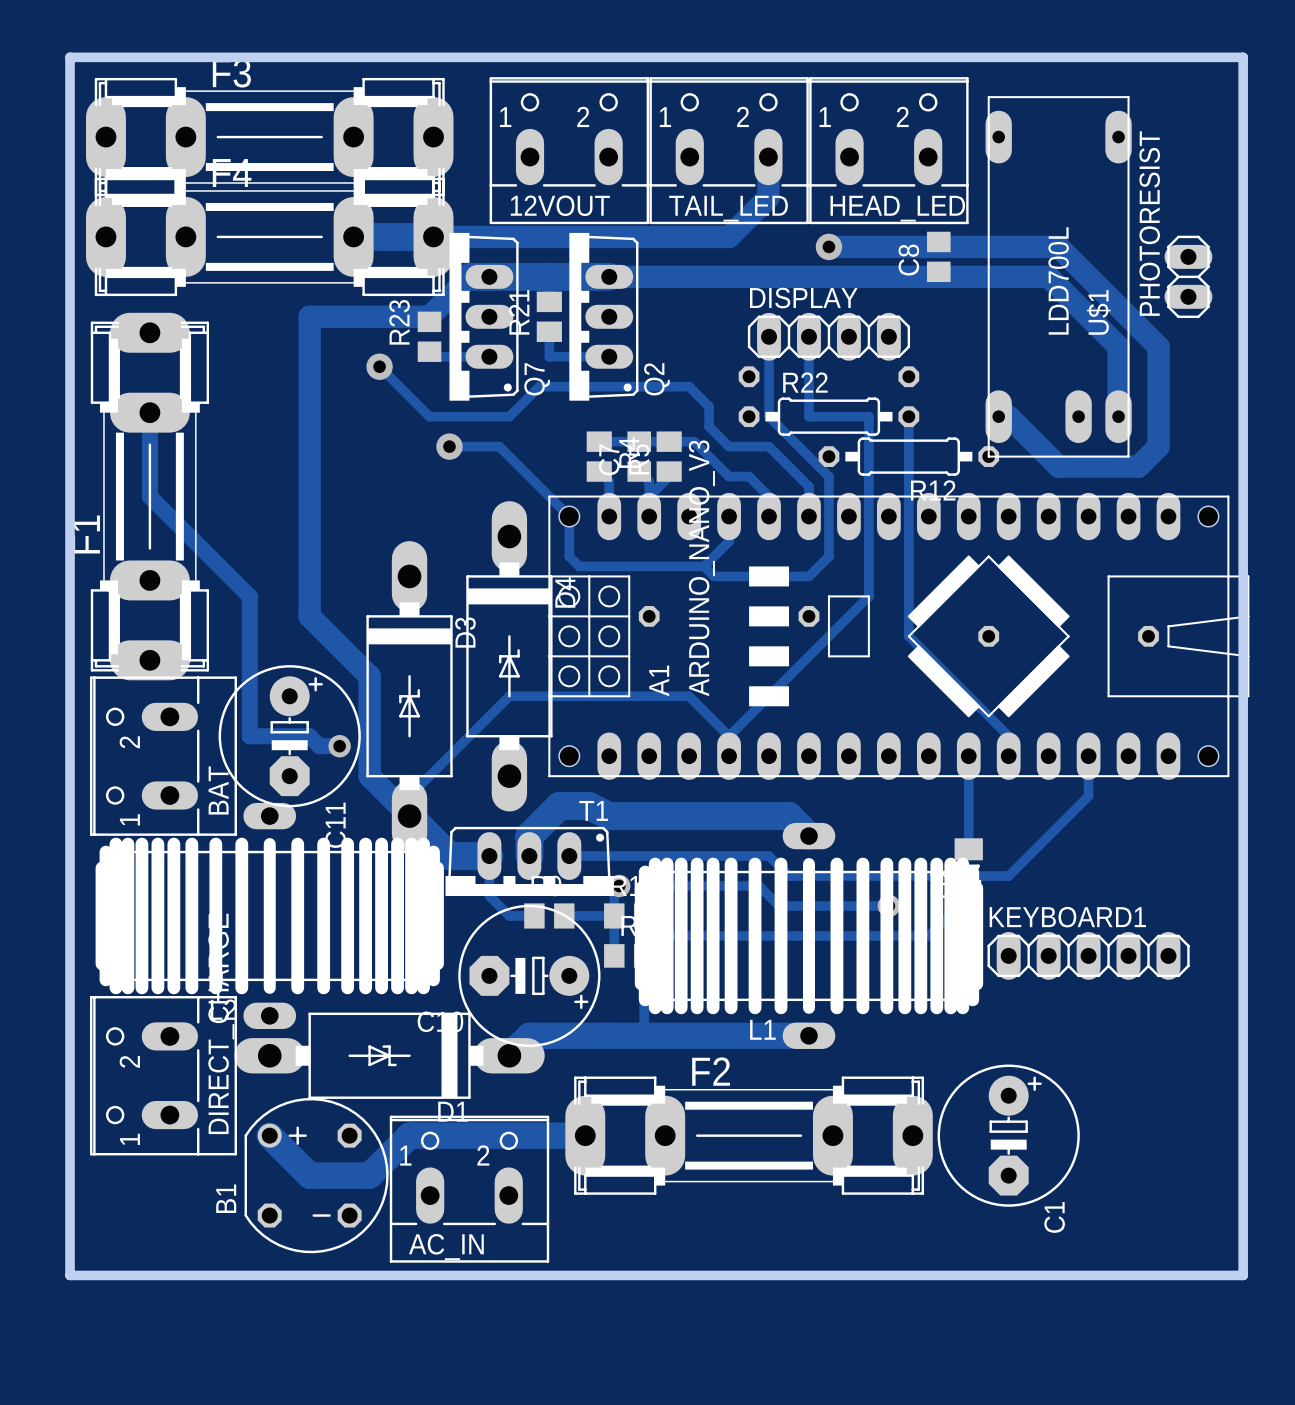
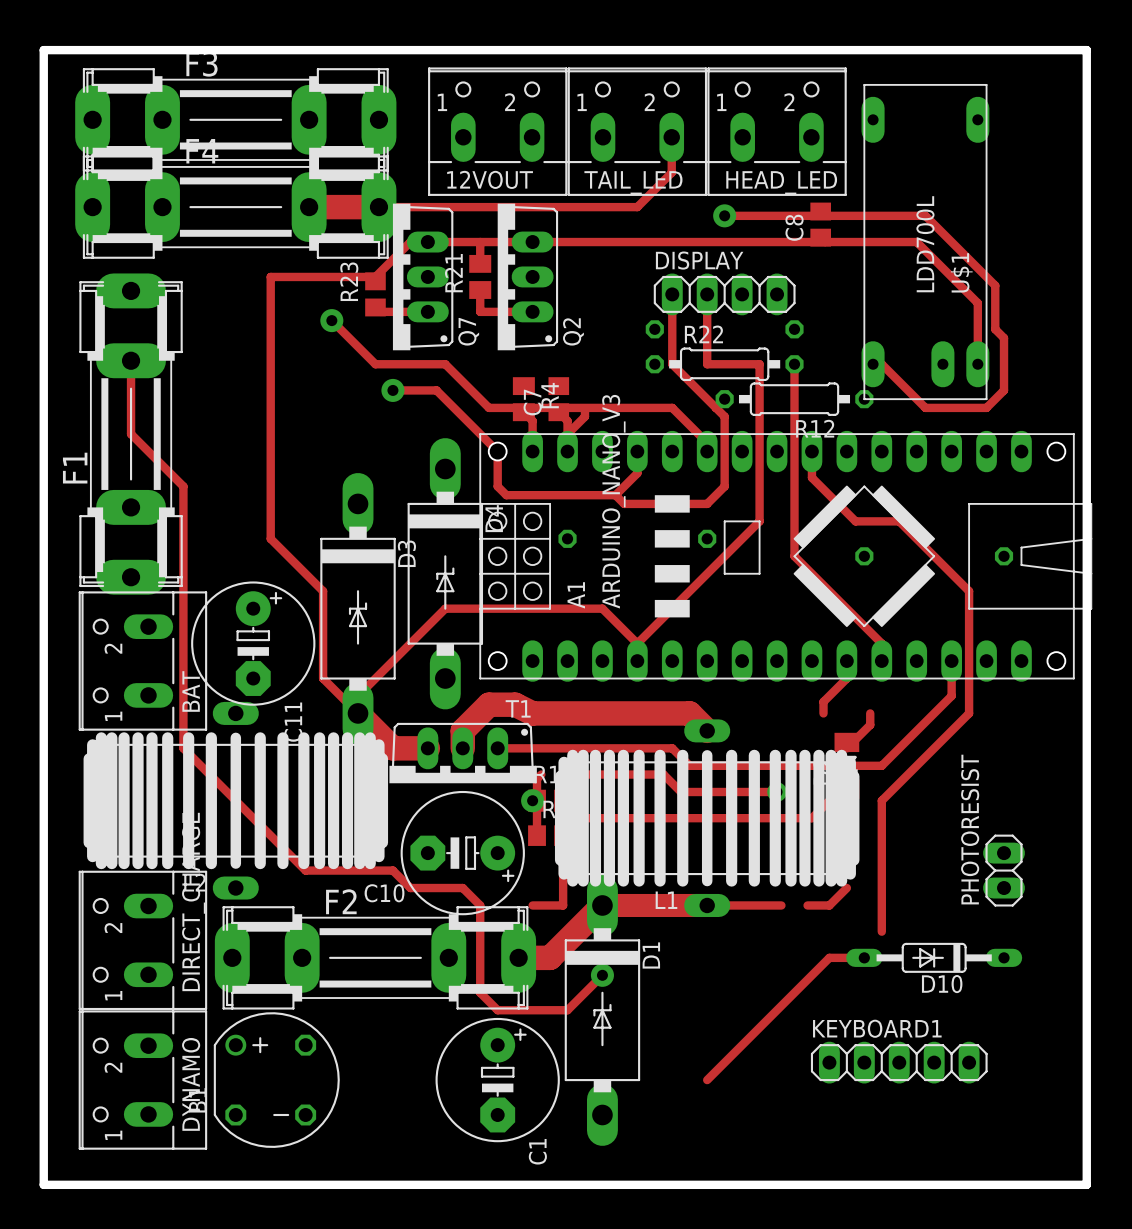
board edge: (70, 57) (70, 1275) (1243, 1275) -> (61, 50) (43, 50) (43, 1184) (1086, 1184) (1086, 1114)
track width: thick (768, 172) (768, 197) (729, 236) (433, 236) -> thin (671, 151) (671, 172) (637, 207) (378, 207)
track width: thick (828, 246) (928, 246) -> thin (724, 215) (811, 215)
track width: thick (933, 246) (1058, 246) (1138, 326) -> thin (816, 215) (925, 215) (995, 285)
PHOTORESIST: (1188, 276) -> none
track: (1138, 326) (1158, 346) (1158, 446) (1138, 466) (1128, 466) -> (995, 285) (995, 329) (1004, 338) (1004, 390) (986, 407)
track width: thick (149, 412) (149, 496) (209, 556) -> thin (131, 360) (131, 434) (183, 486)
track: (509, 416) (539, 386) (689, 386) (709, 406) (709, 426) (729, 446) (769, 446) (808, 486) (808, 506) -> (445, 364) (488, 407) (672, 407) (707, 442)
track width: thick (998, 416) (1008, 416) (1058, 466) (1128, 466) -> thin (873, 364) (881, 364) (925, 407) (986, 407)
track width: thick (1118, 416) (1118, 346) (1048, 276) (469, 276) (429, 316) (309, 316) (309, 616) (369, 676) (369, 776) (409, 816) -> thin (977, 364) (977, 303) (916, 242) (410, 242) (375, 276) (270, 276) (270, 538) (323, 591) (323, 678) (358, 713)
track: (599, 441) (694, 441) (729, 476) (749, 476) (769, 496) (769, 516) -> none
part: (669, 456) -> none
track: none -> (811, 451) (811, 477) (855, 521) (899, 521) (969, 591) (969, 713) (881, 800) (881, 931)
track: (209, 556) (249, 596) (249, 736) (309, 736) (319, 746) (339, 746) -> (183, 486) (183, 748) (305, 870) (392, 870) (410, 888) (462, 888) (480, 905) (480, 992) (497, 1010) (567, 1010) (602, 975)
via: (339, 746) -> none
track: (968, 776) (968, 849) -> (846, 678) (823, 701) (823, 713)
track: none -> (870, 713) (870, 724) (846, 748)
track: (489, 856) (489, 895) (509, 915) (534, 915) -> none
via: (619, 886) -> none
part: (549, 915) -> none
track: (564, 915) (609, 915) -> none
via: none -> (532, 800)
KEYBOARD1 position: (1088, 955) -> (899, 1062)
PHOTORESIST: none -> (1004, 870)
track: none -> (846, 888) (829, 905) (807, 905)
track: (689, 1035) (529, 1035) (509, 1055) -> (602, 905) (550, 957) (518, 957)
track: none -> (707, 905) (781, 905)
D1 rotation: 0° (389, 1055) -> 90° counterclockwise (602, 1010)
D1 position: (389, 1055) -> (602, 1010)
track: none -> (864, 957) (829, 957) (707, 1080)
D10: none -> (934, 957)
via: none -> (602, 975)
track: (269, 1135) (309, 1175) (369, 1175) (409, 1135) (585, 1135) -> none
F2 position: (749, 1135) -> (375, 957)
C1 position: (1008, 1135) -> (497, 1080)
B1 position: (316, 1175) -> (276, 1080)
AC_IN: (469, 1189) -> none
DYNAMO: none -> (142, 1080)

